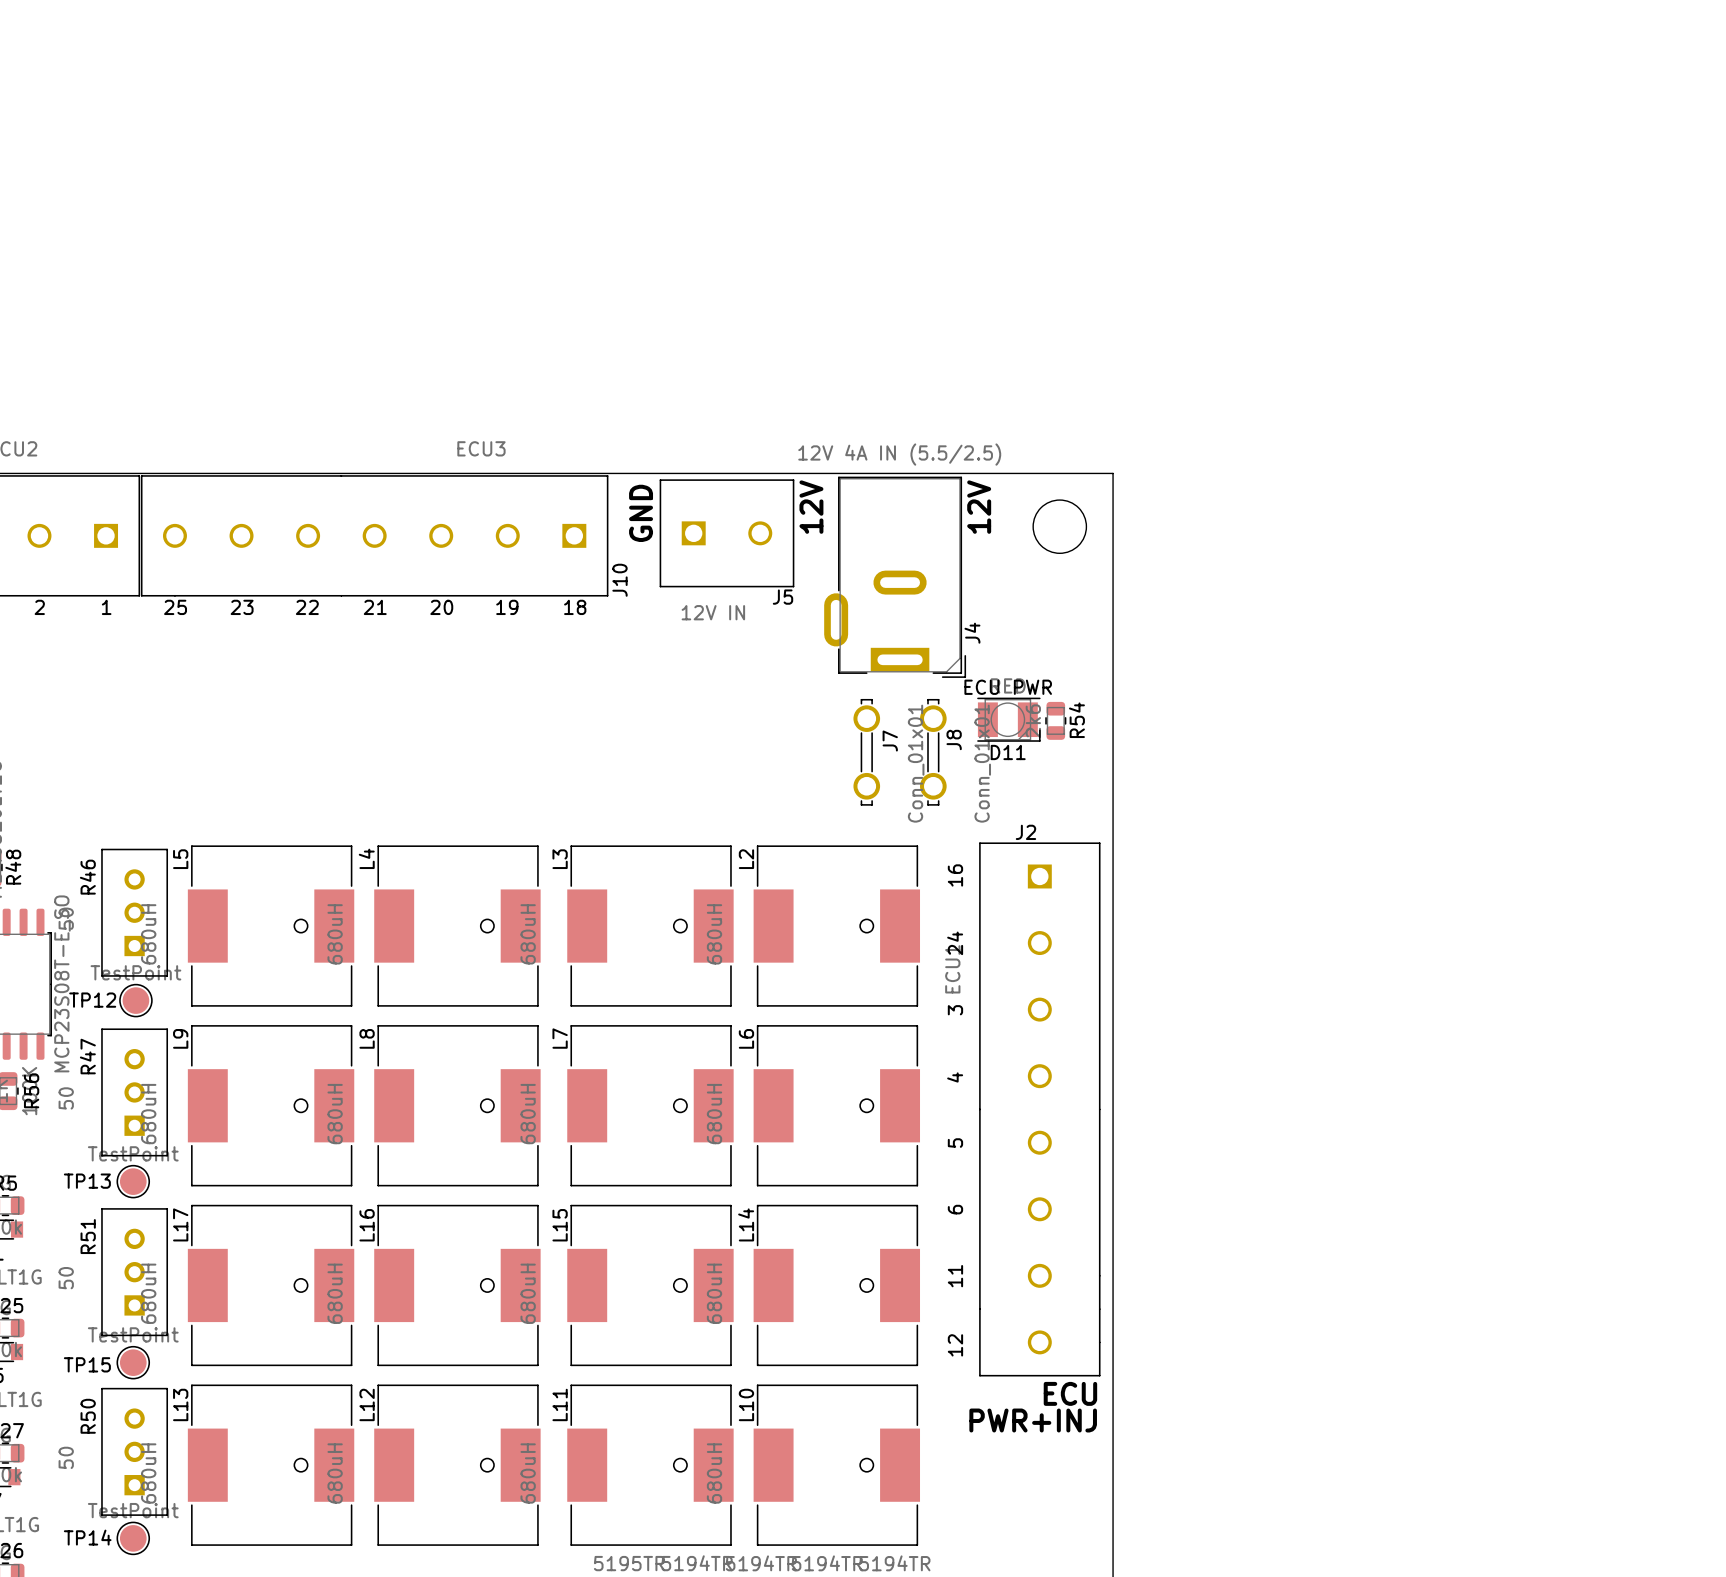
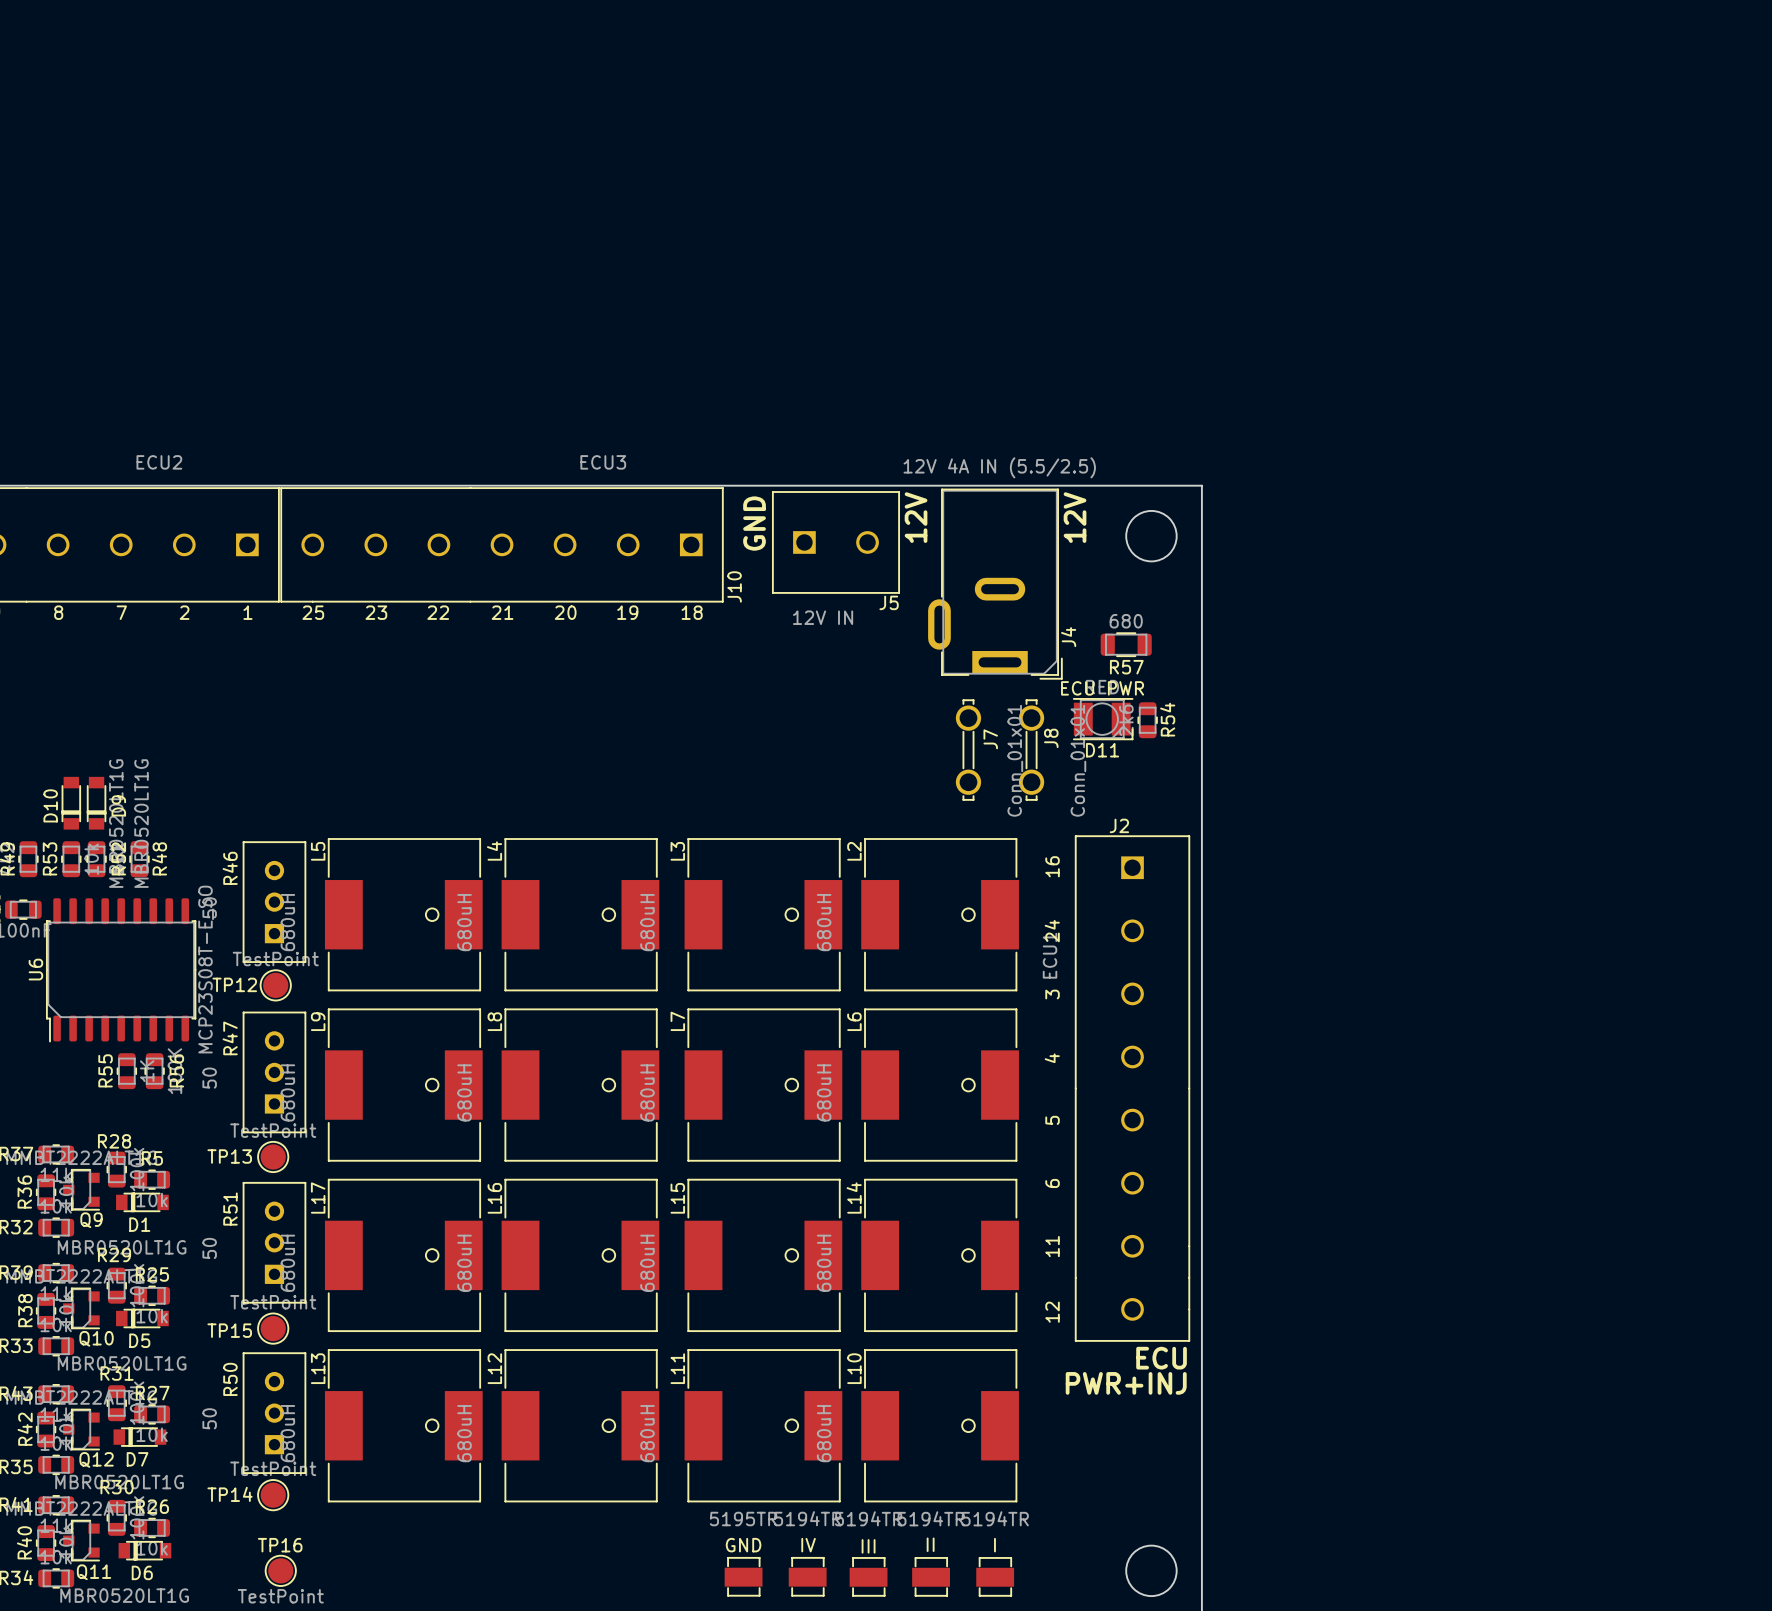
R57: none -> 680 (1126, 644)

